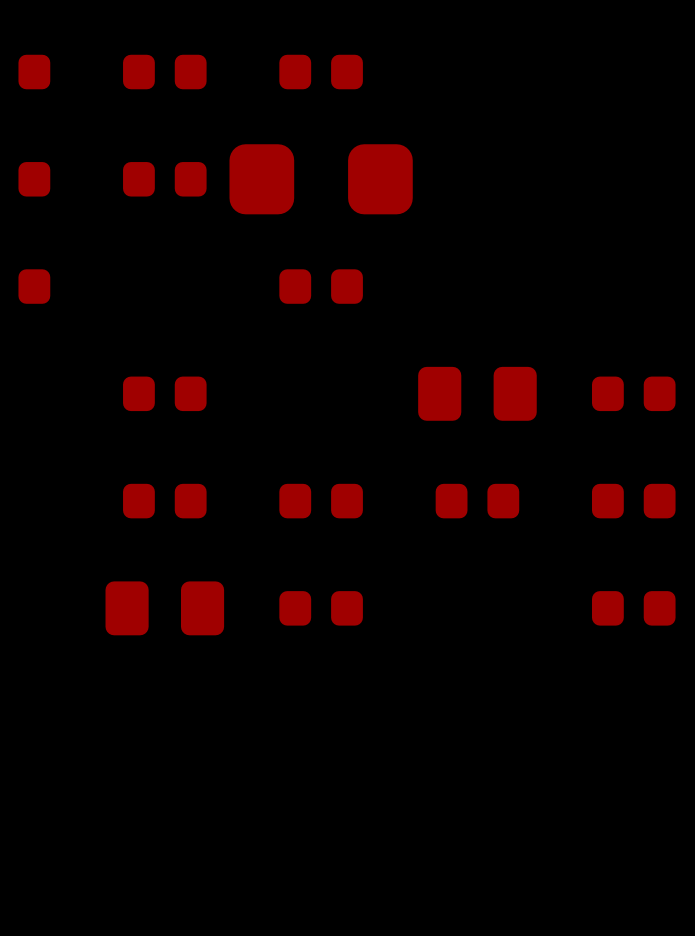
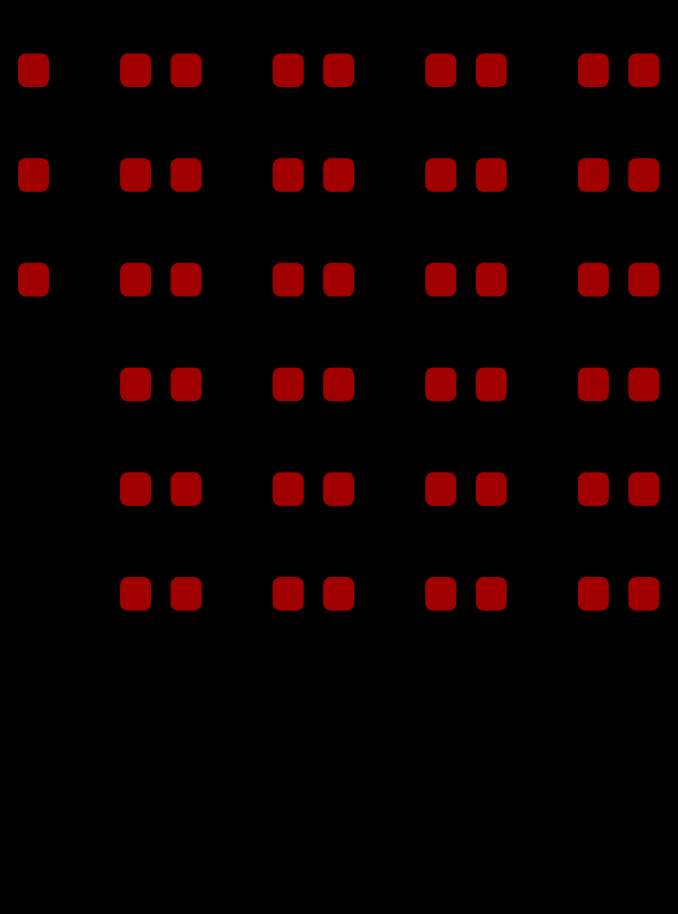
part: none -> (466, 70)
part: none -> (618, 70)
part footprint: [229, 144, 413, 215] -> [272, 158, 355, 192]
part: none -> (466, 175)
part: none -> (618, 175)
part: none -> (160, 279)
part: none -> (466, 279)
part: none -> (618, 279)
part footprint: [418, 366, 537, 421] -> [425, 367, 507, 402]
part: none -> (313, 384)
part footprint: [105, 581, 225, 636] -> [120, 576, 202, 611]
part: none -> (466, 593)

